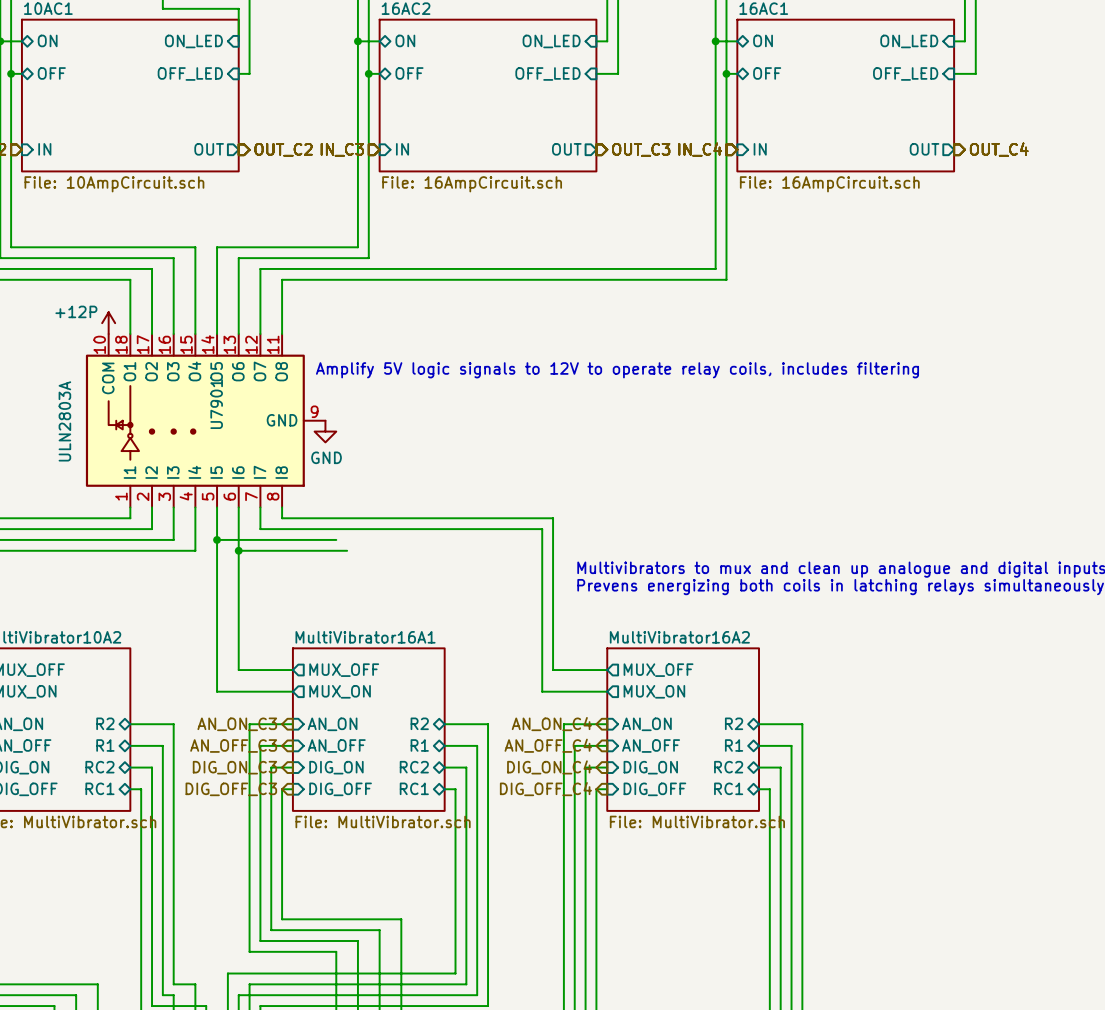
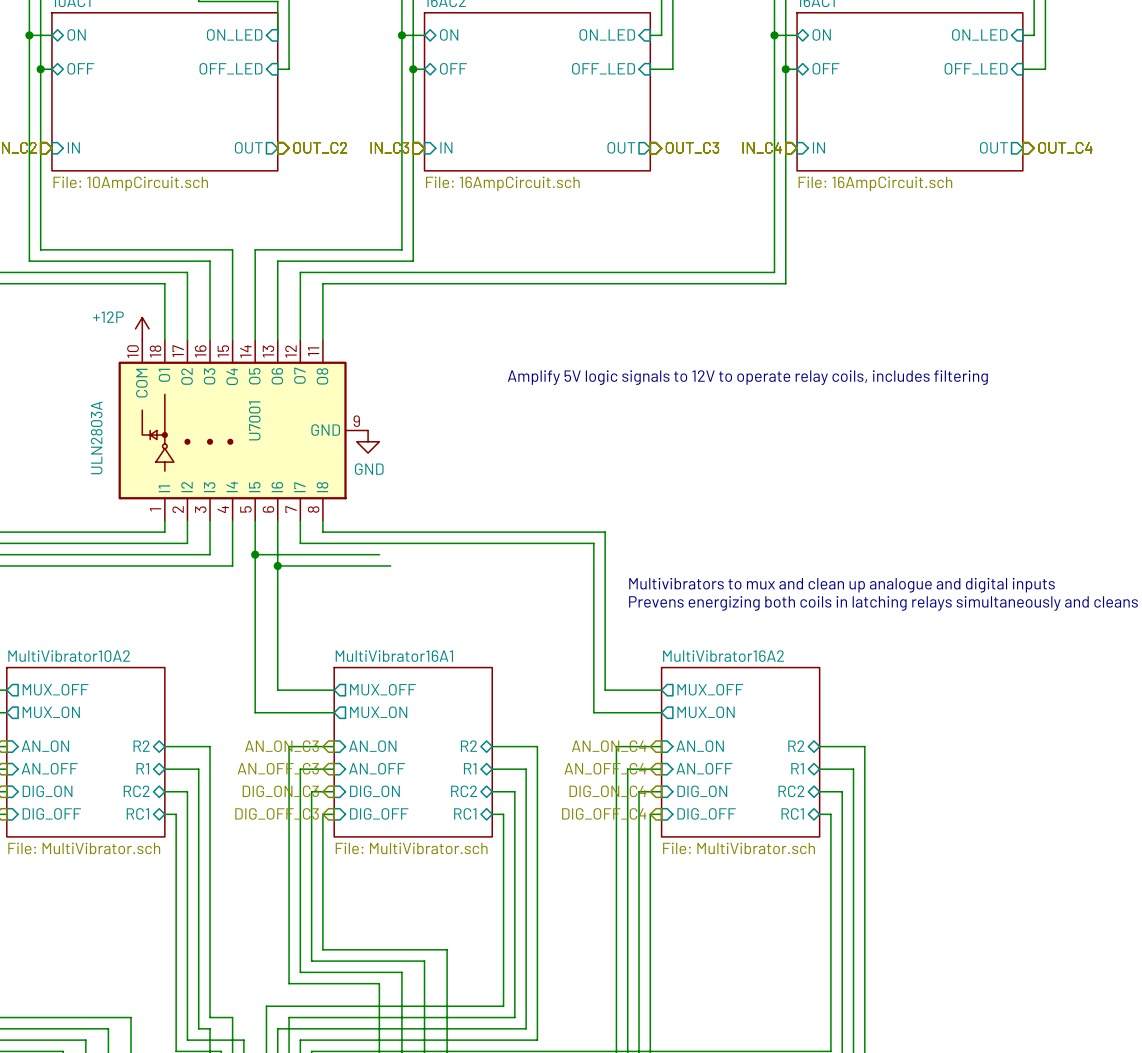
U7901 name: U7901 (216, 404) -> U7001 (254, 420)

